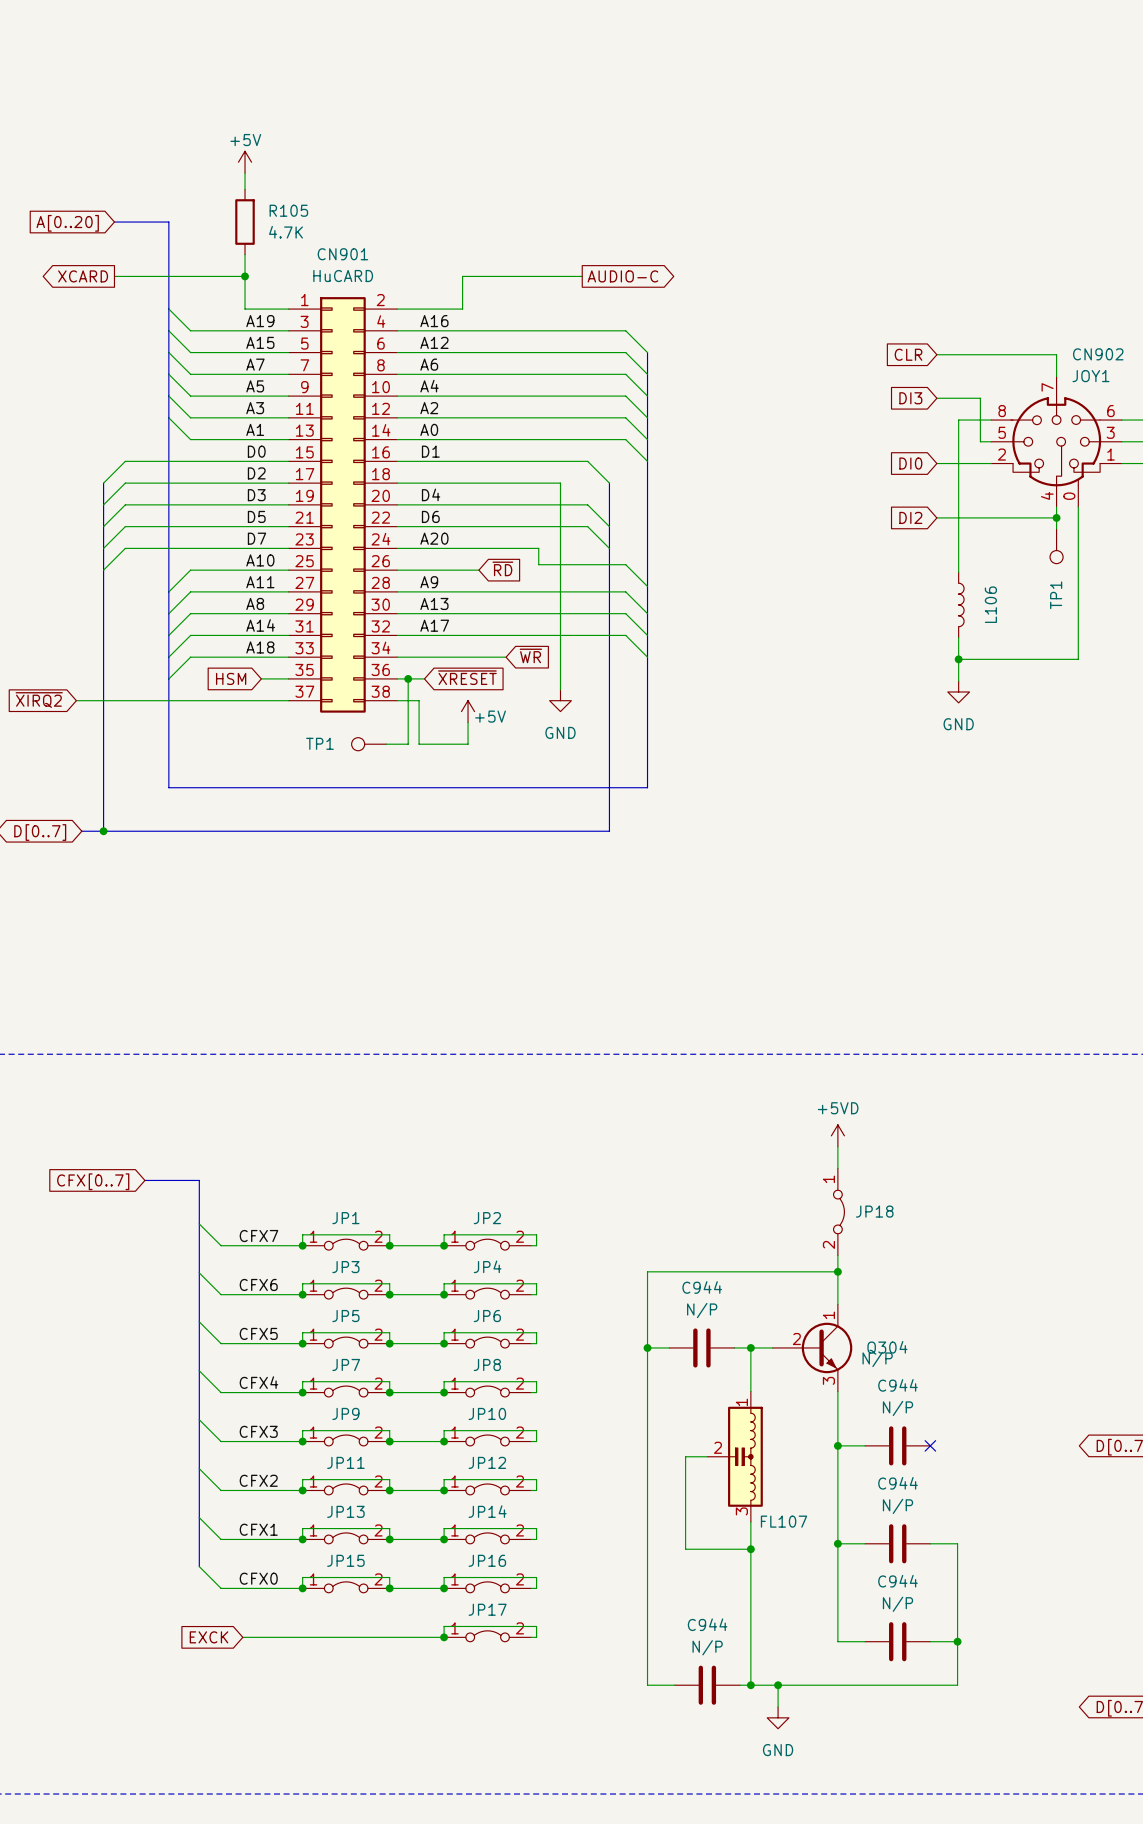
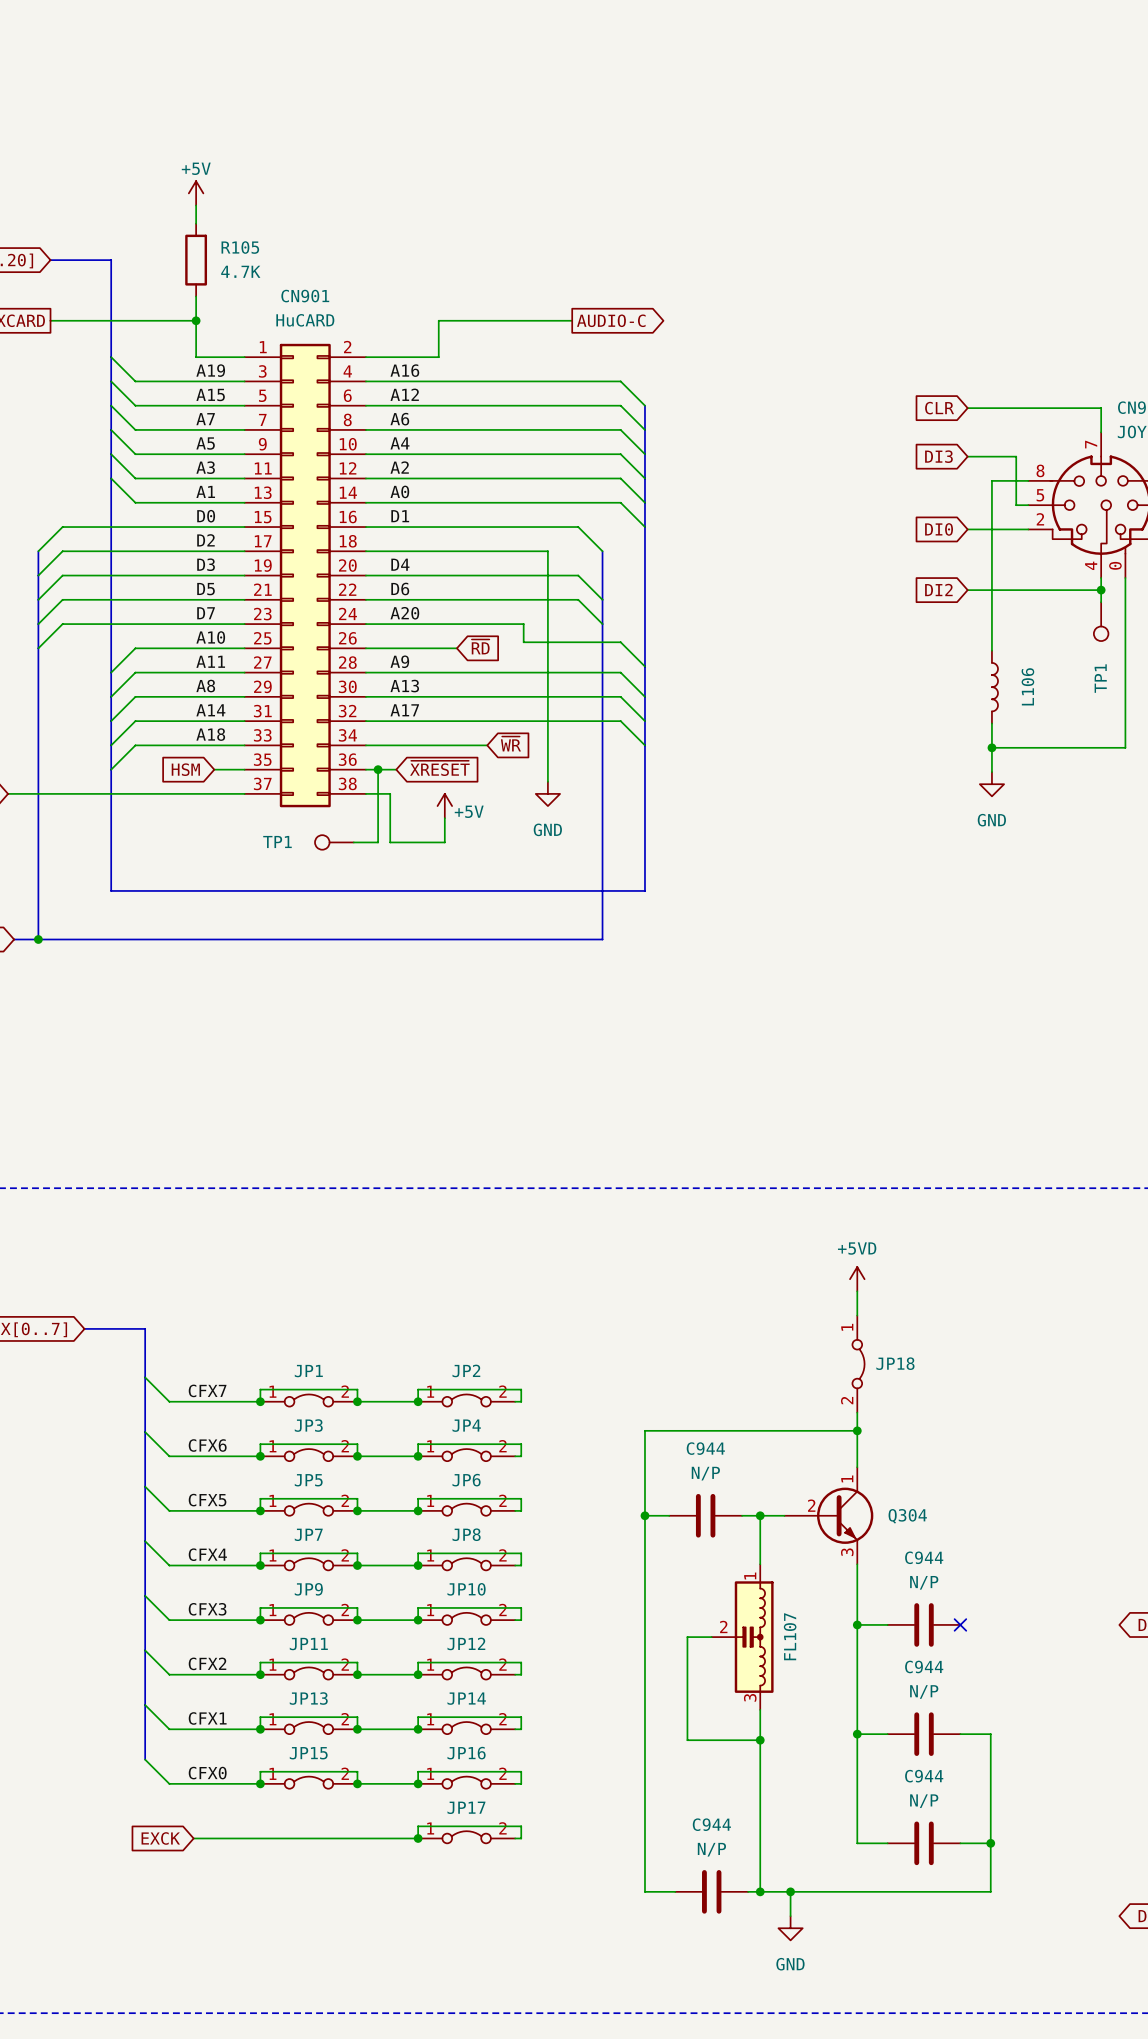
Q304 value: N/P (877, 1359) -> none
FL107 name rotation: 0° (784, 1521) -> 90° counterclockwise (790, 1636)
FL107 name position: FL107 (784, 1521) -> FL107 (790, 1636)

